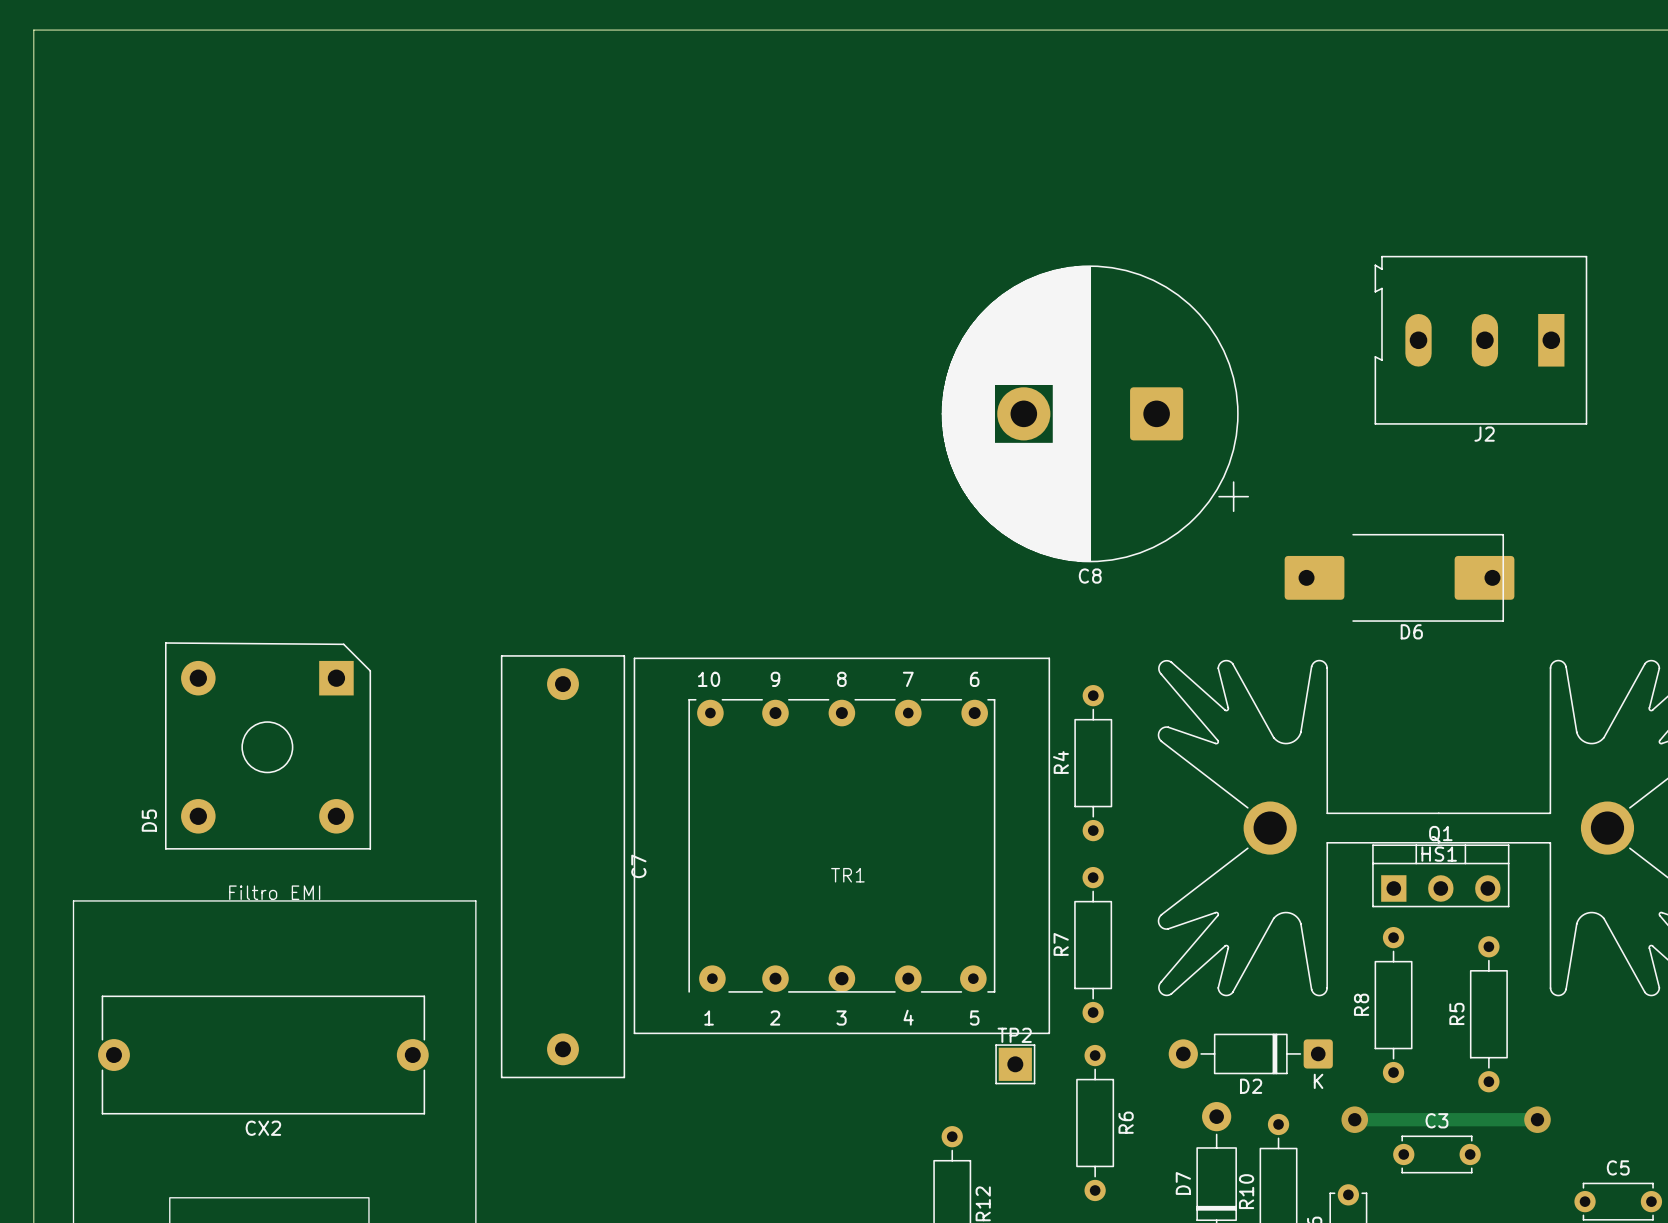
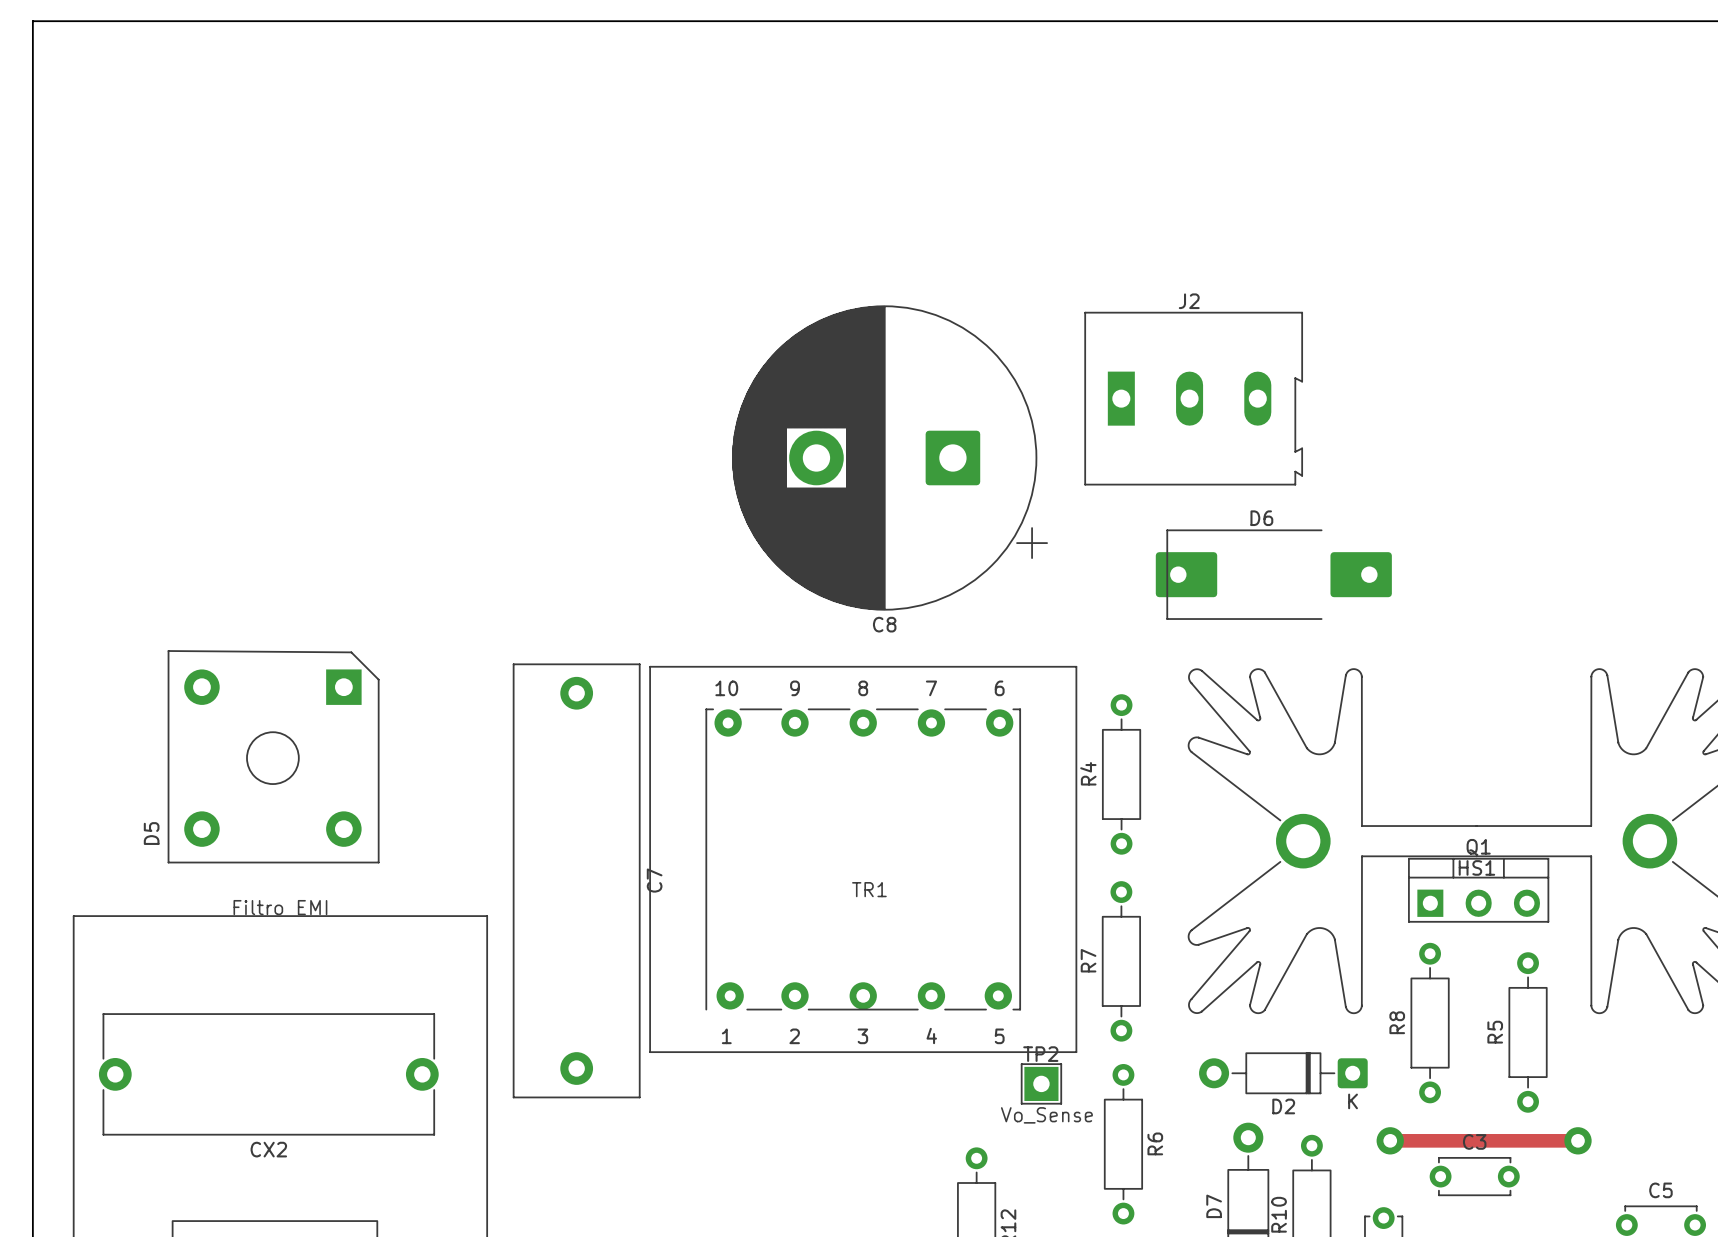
J2 rotation: 0° (1480, 340) -> 180° (1193, 398)
J2 position: (1480, 340) -> (1193, 398)
C8 position: (1095, 413) -> (890, 457)
D6 rotation: 0° (1399, 577) -> 180° (1273, 574)
D6 position: (1399, 577) -> (1273, 574)
text: none -> Vo_Sense (1046, 1115)

